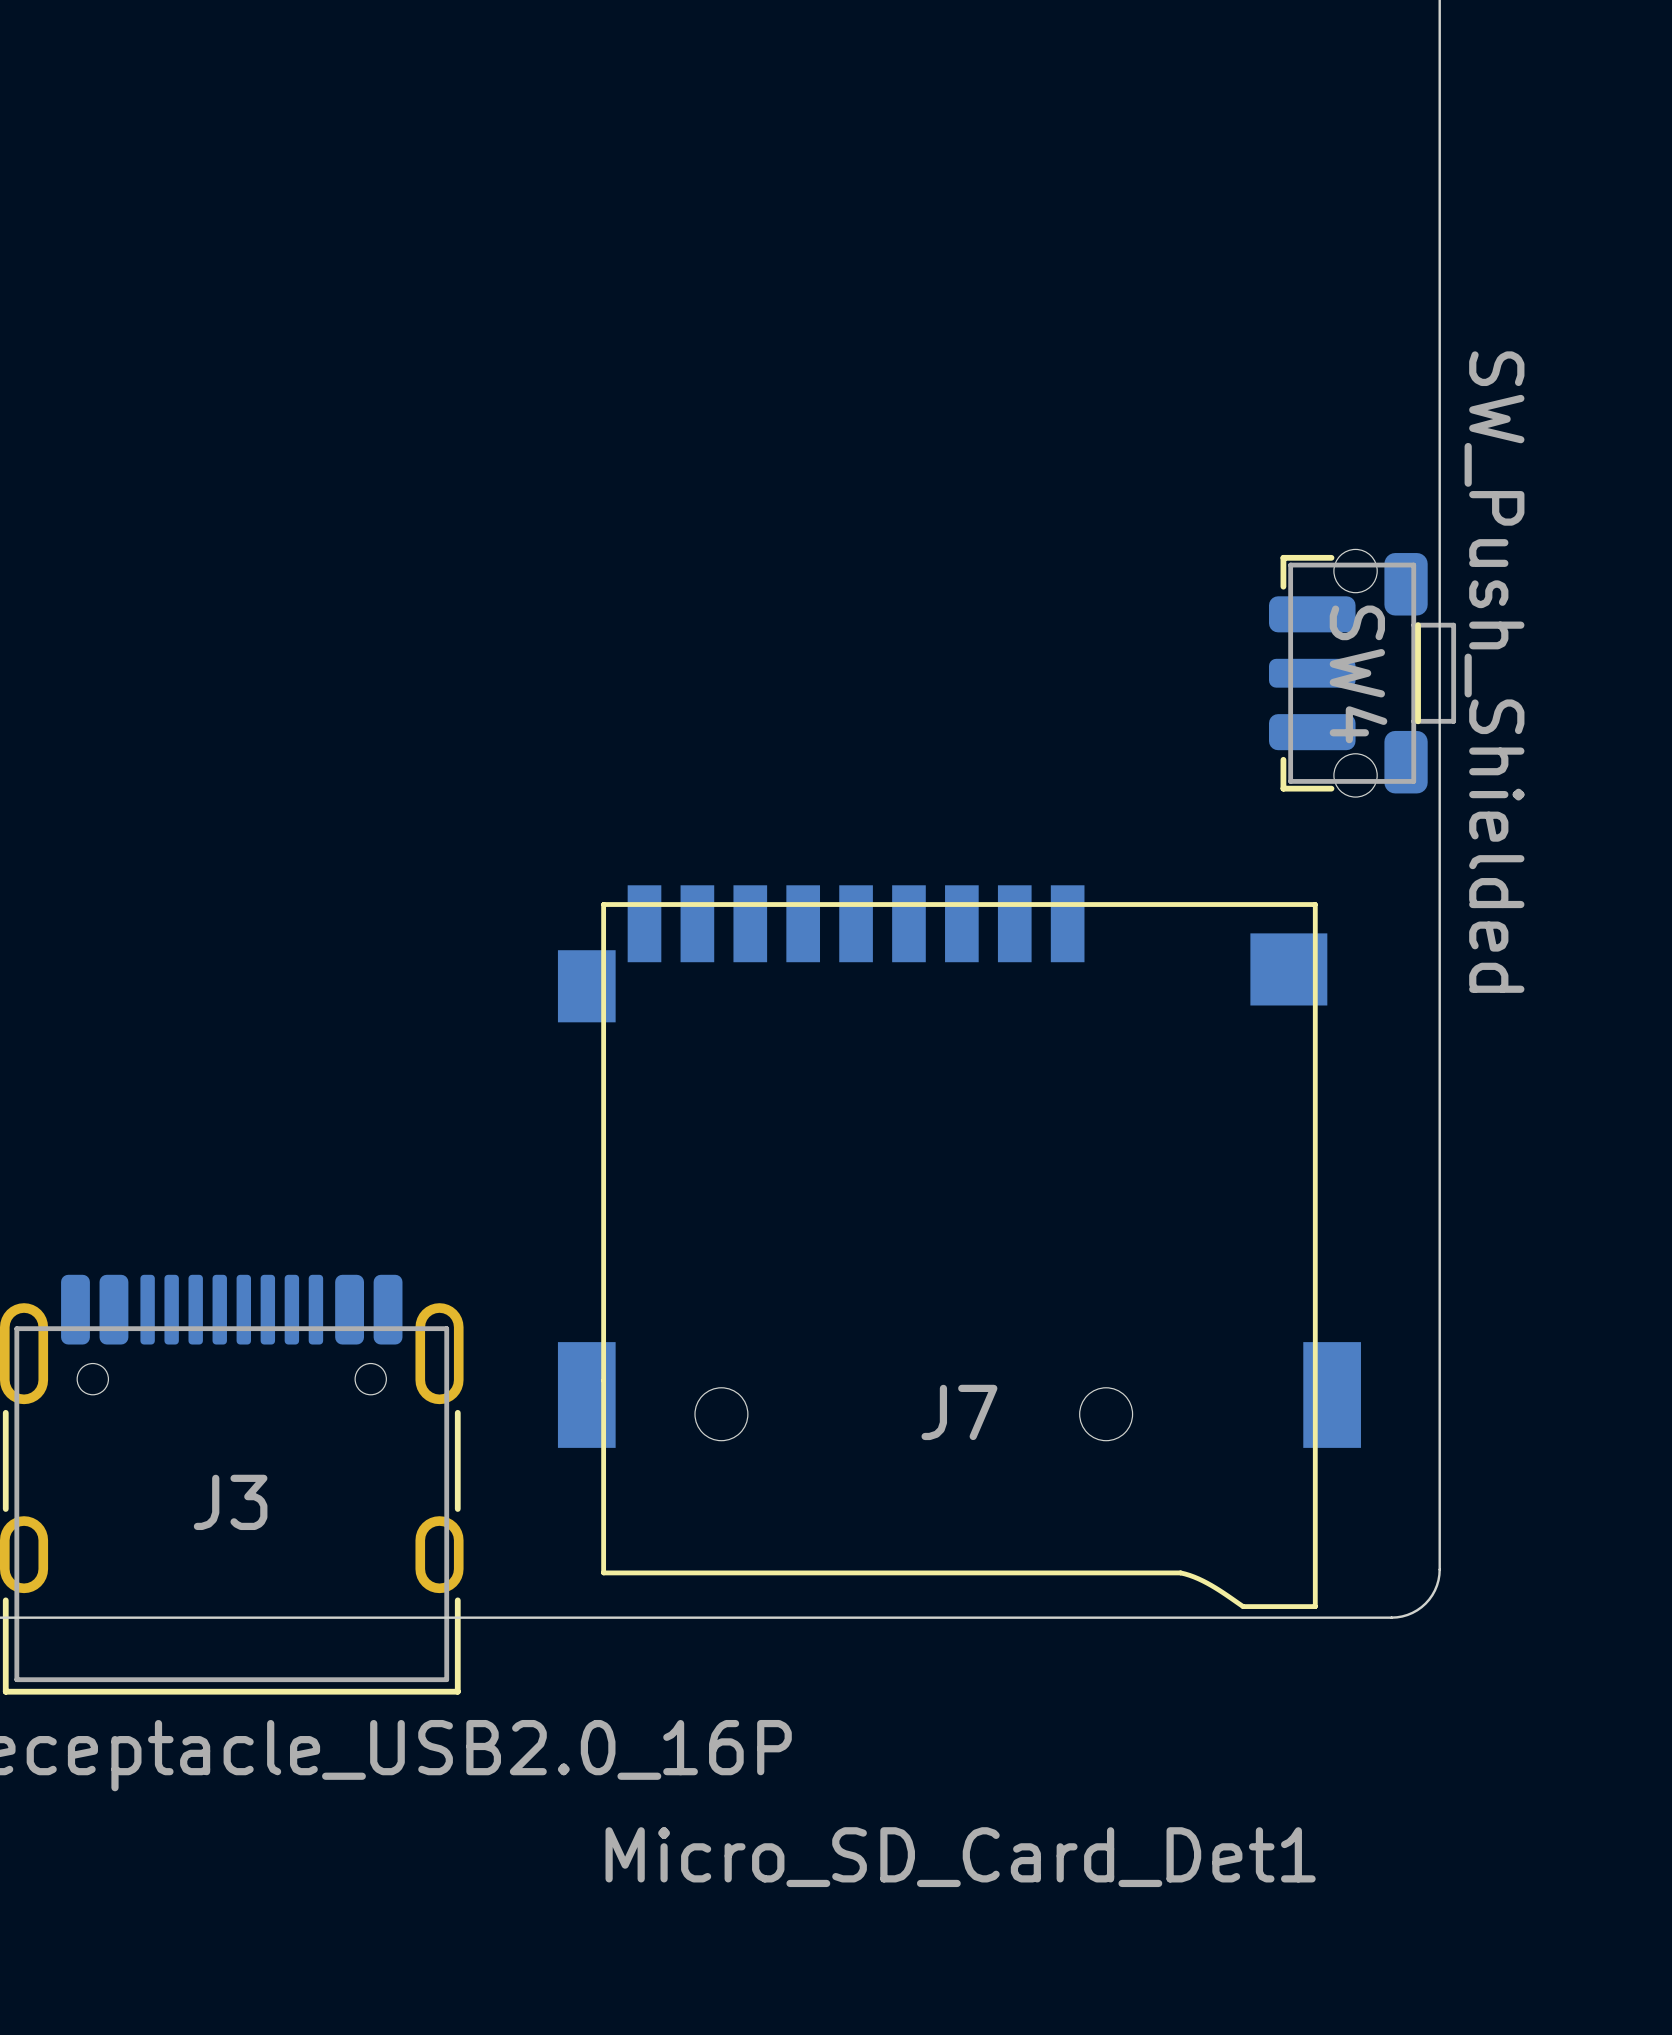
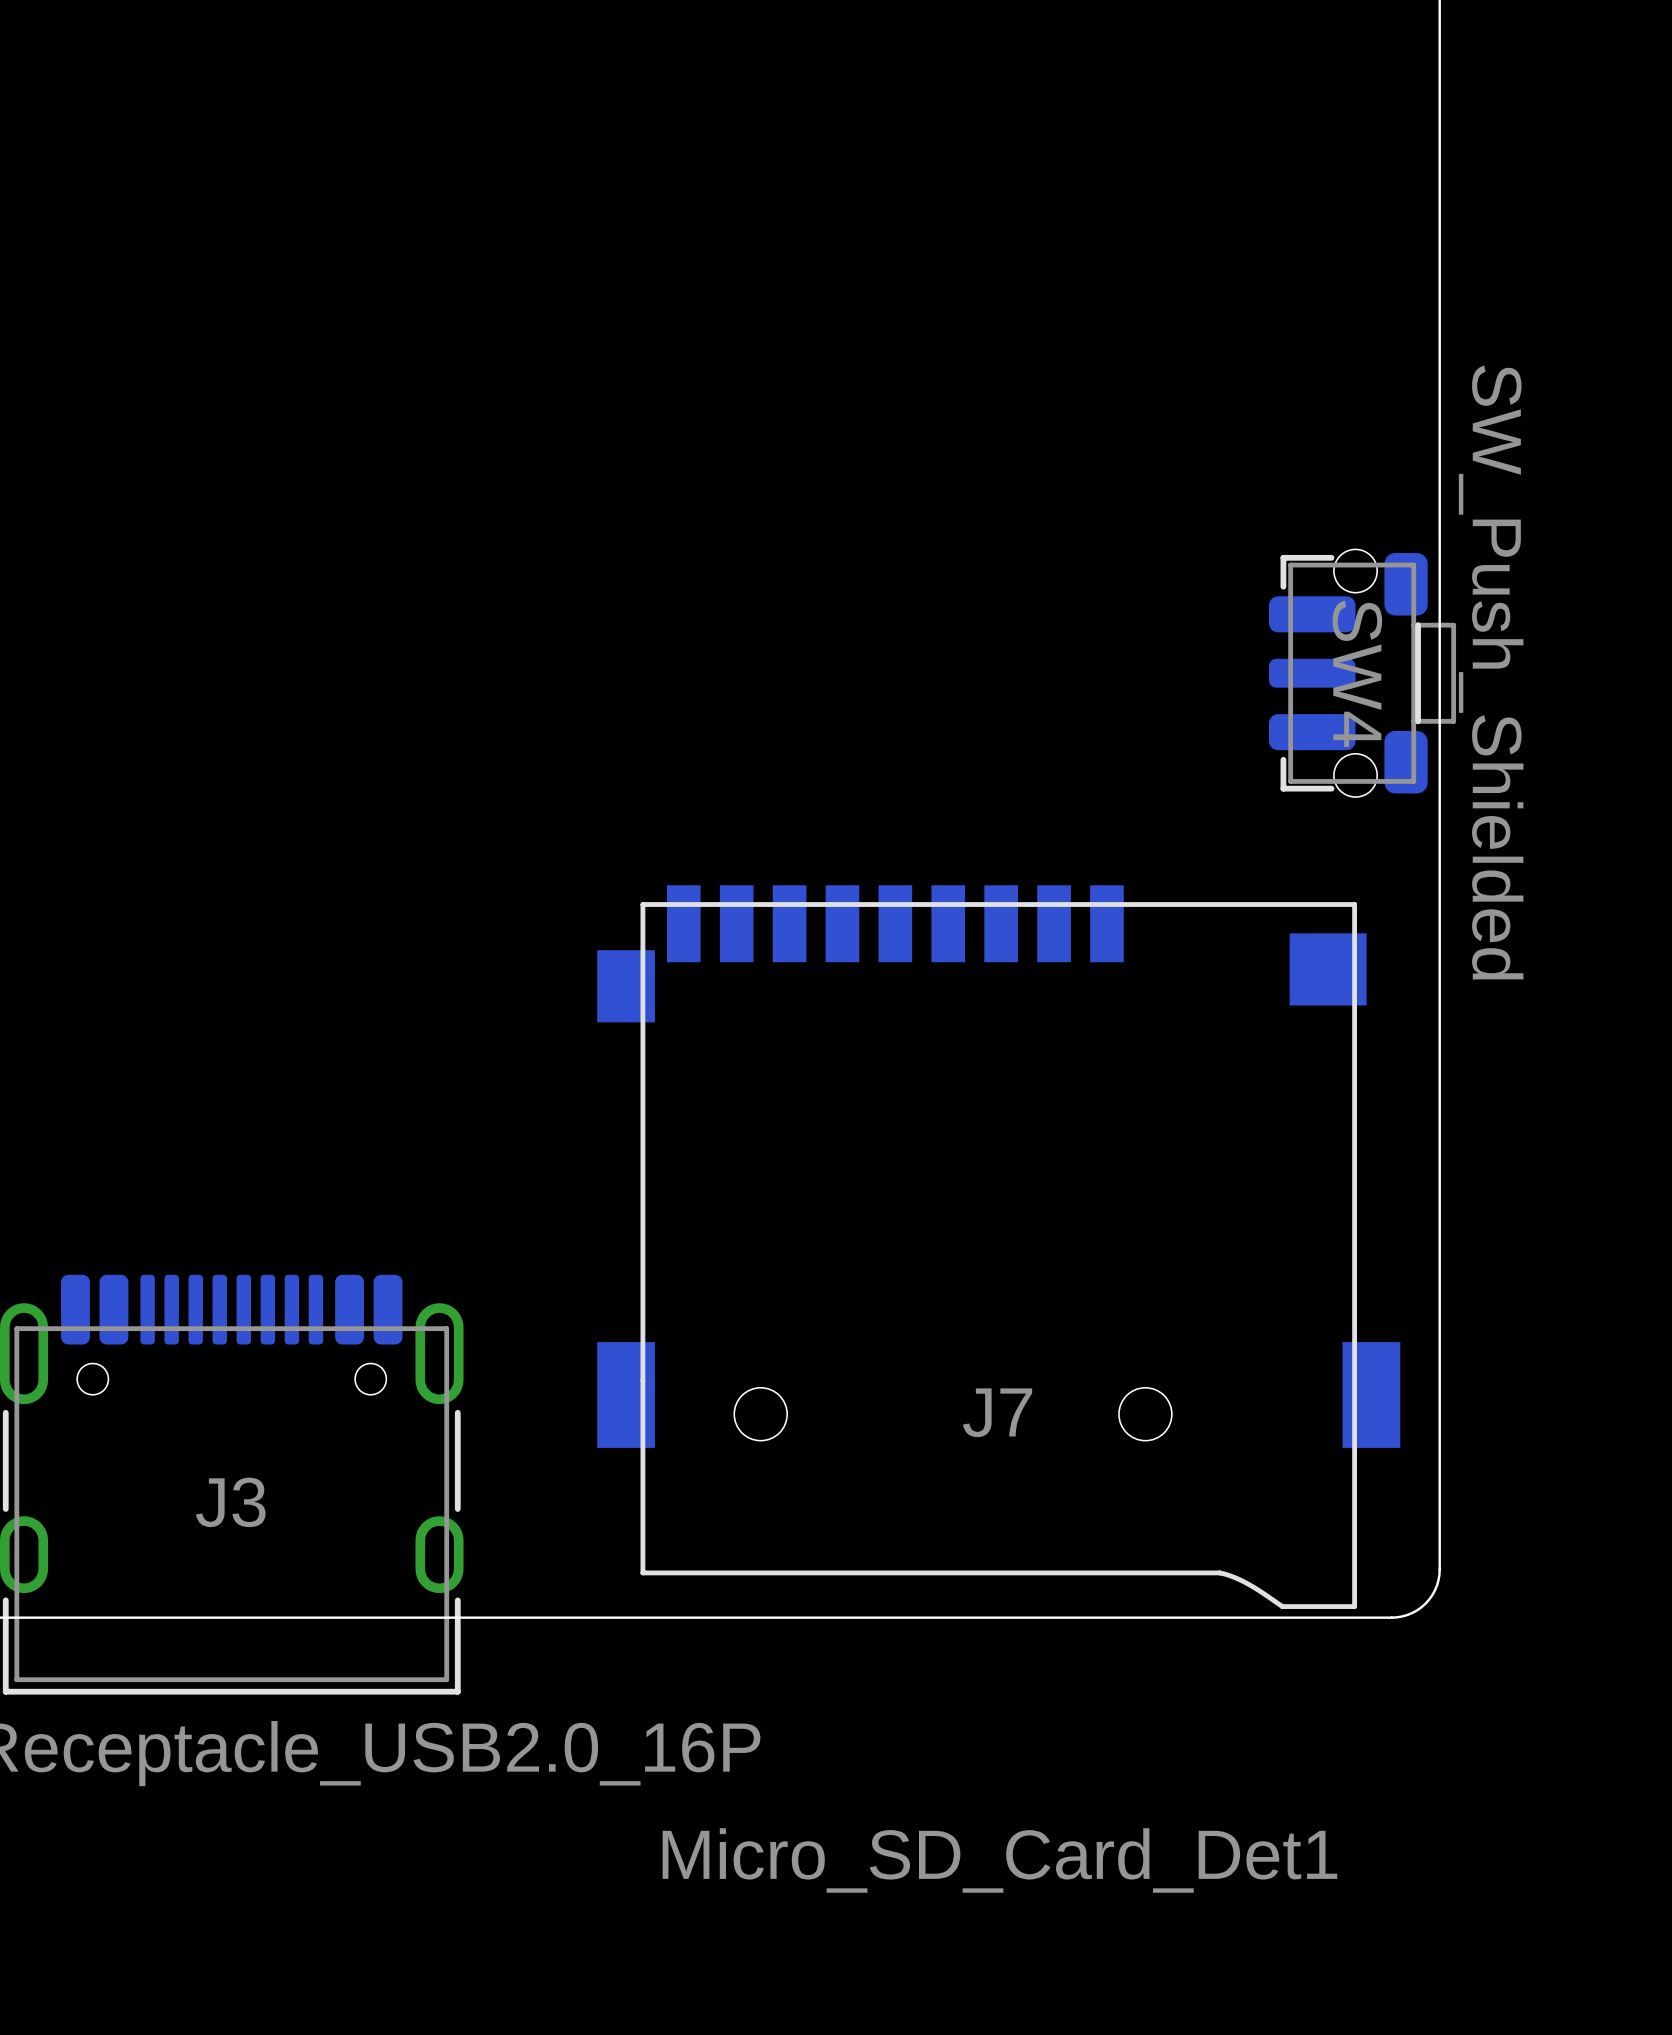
J7 position: (959, 1247) -> (998, 1247)

